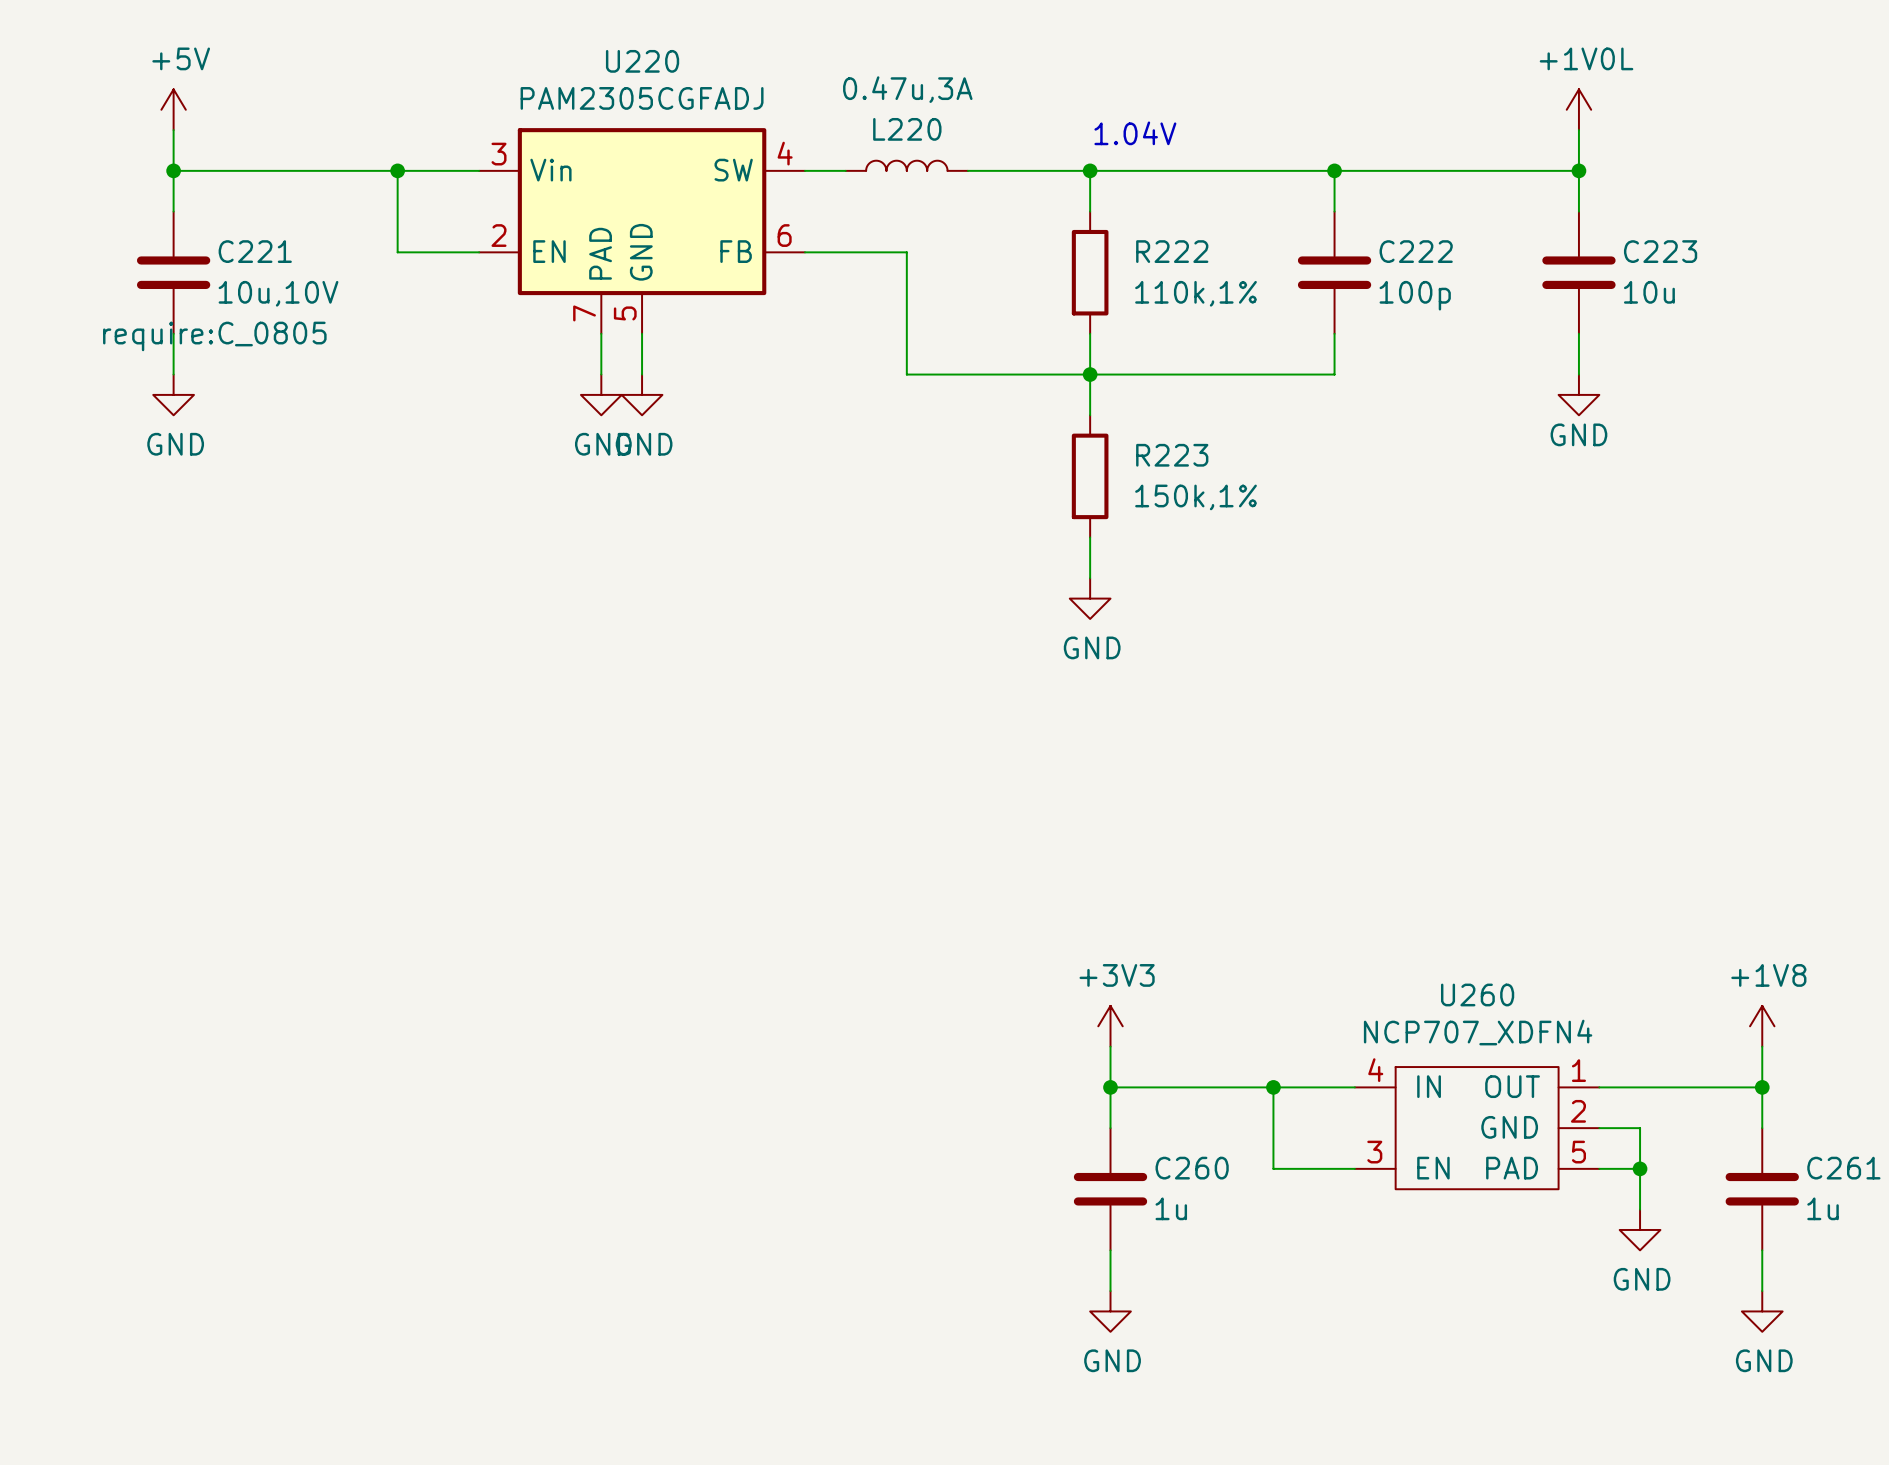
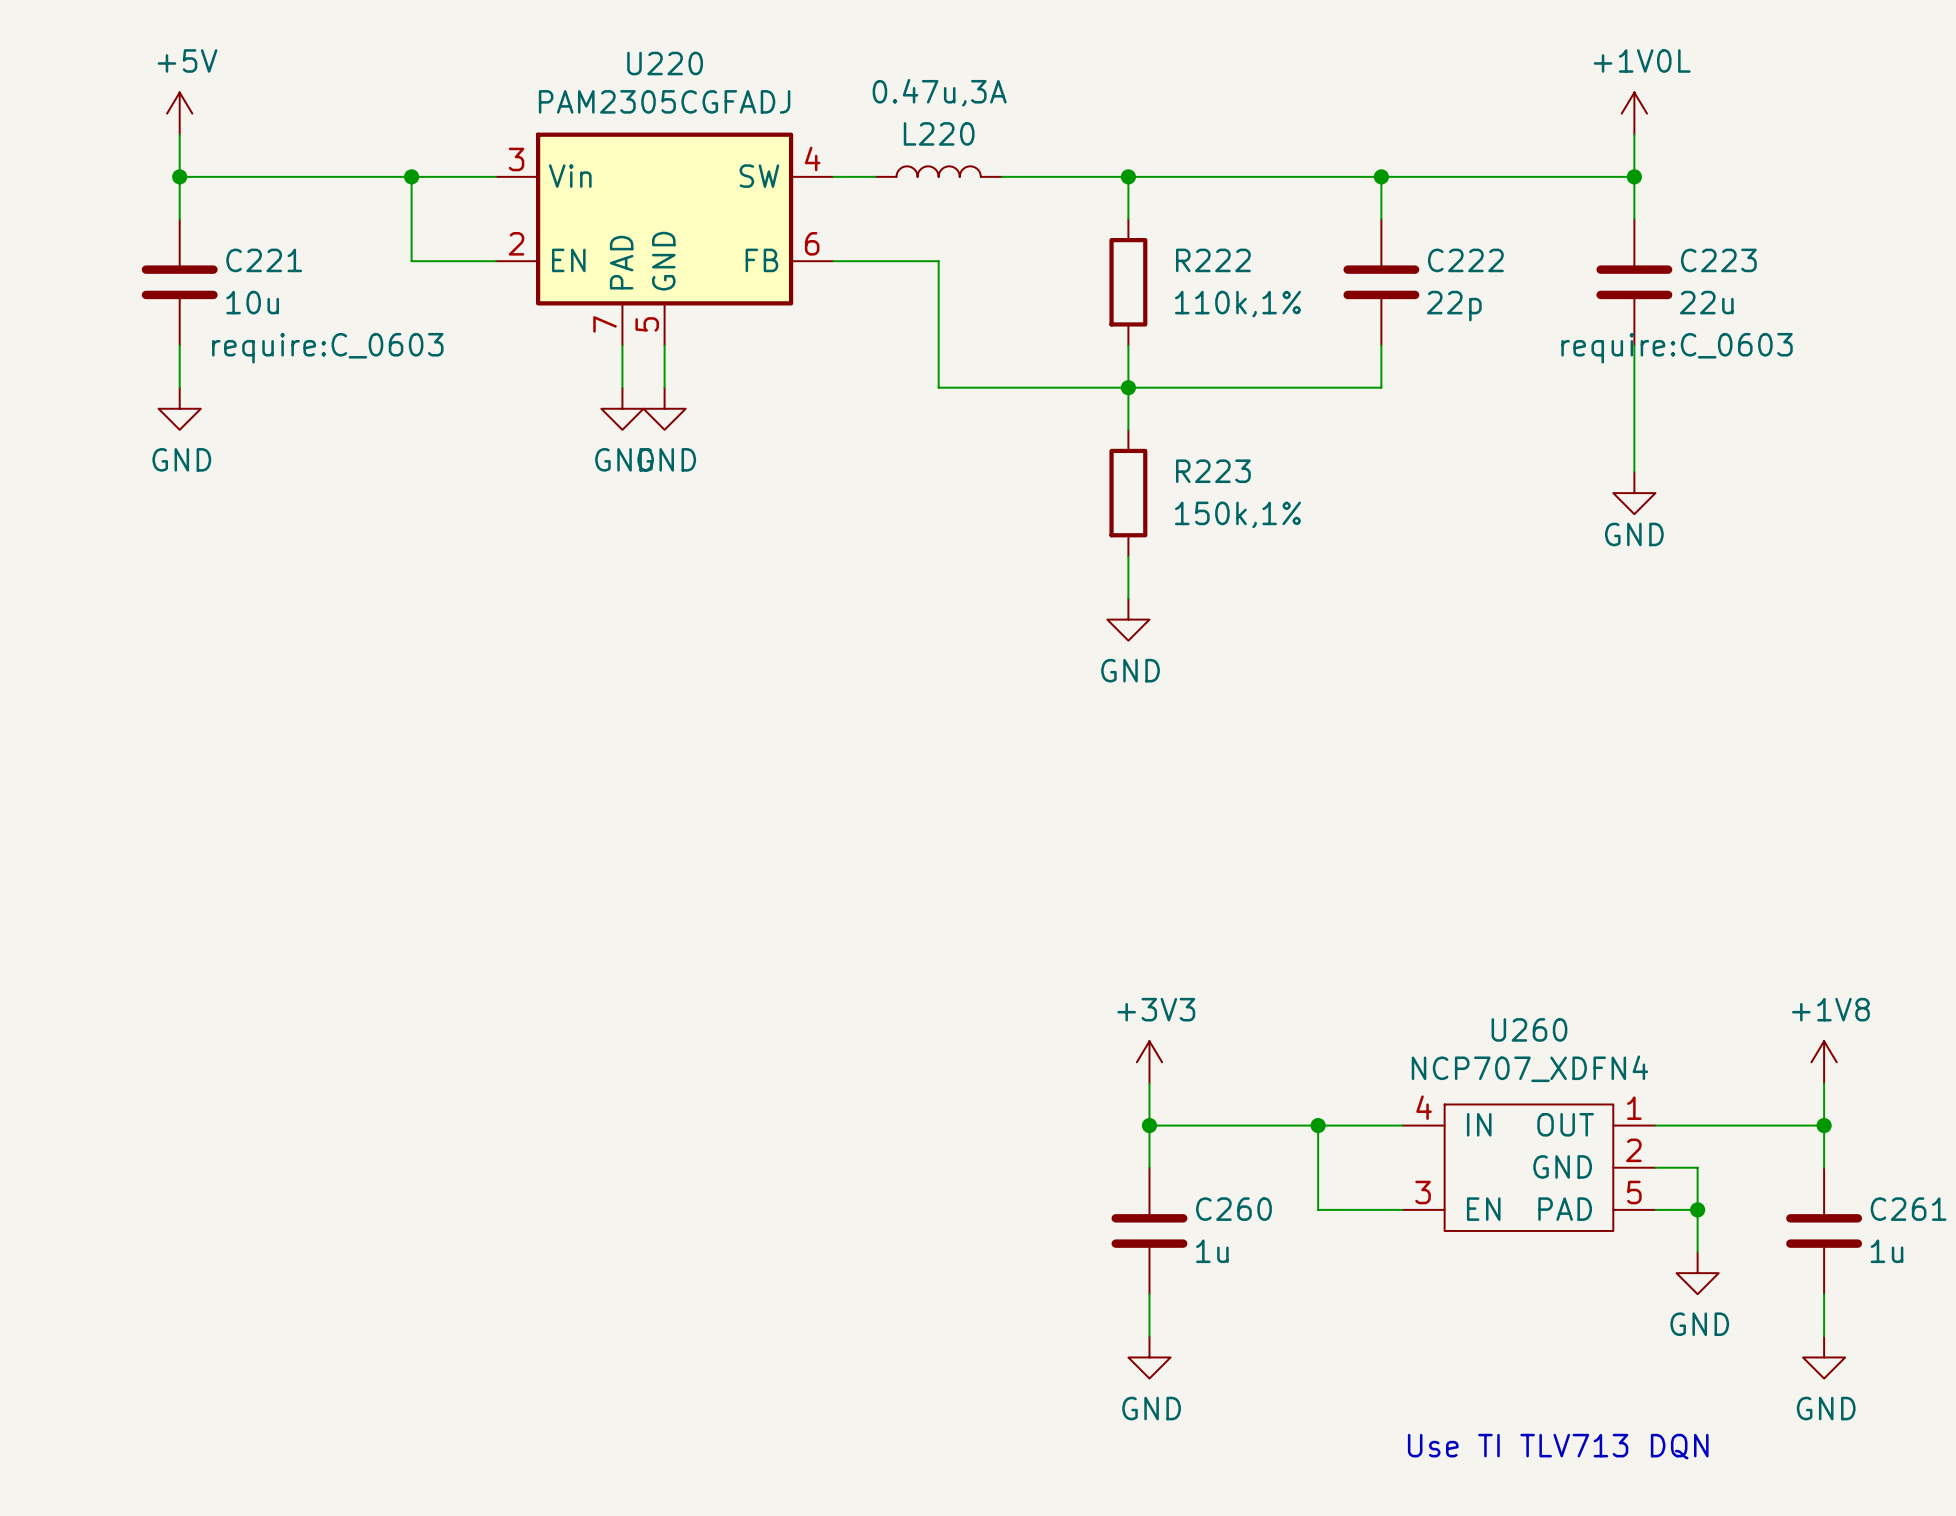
text: 1.04V (1135, 133) -> none
C223 value: 10u (1649, 292) -> 22u (1706, 302)
C221 value: 10u,10V (278, 293) -> 10u (252, 302)
C222 value: 100p (1415, 295) -> 22p (1454, 306)
C221 text: require:C_0805 (214, 336) -> require:C_0603 (327, 348)
C223 text: none -> require:C_0603 (1677, 348)
wire: none -> (1634, 387) (1634, 472)
power symbol position: GND (1578, 394) -> GND (1634, 493)
text: none -> Use TI TLV713 DQN (1558, 1446)

